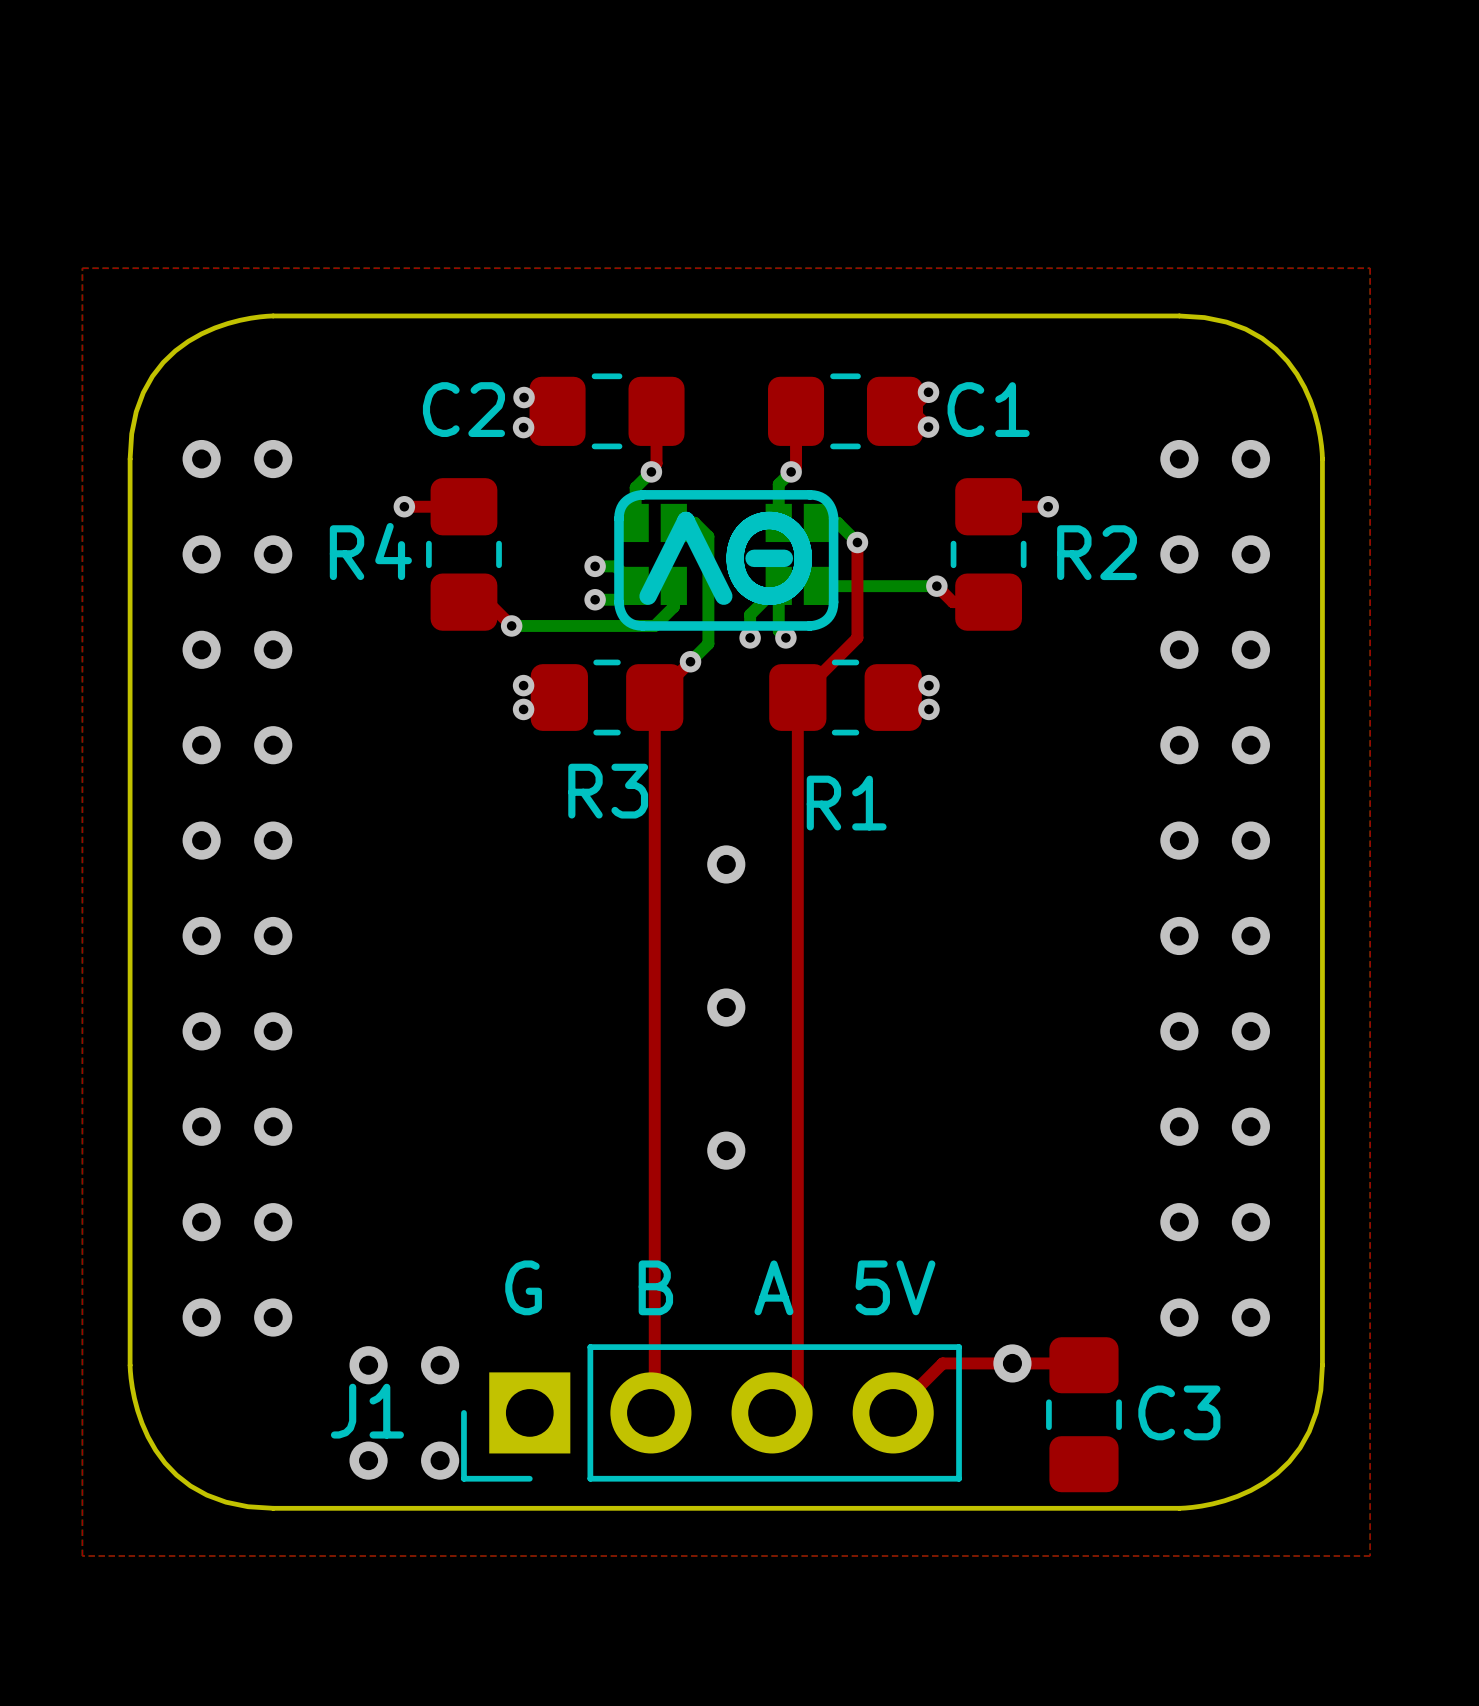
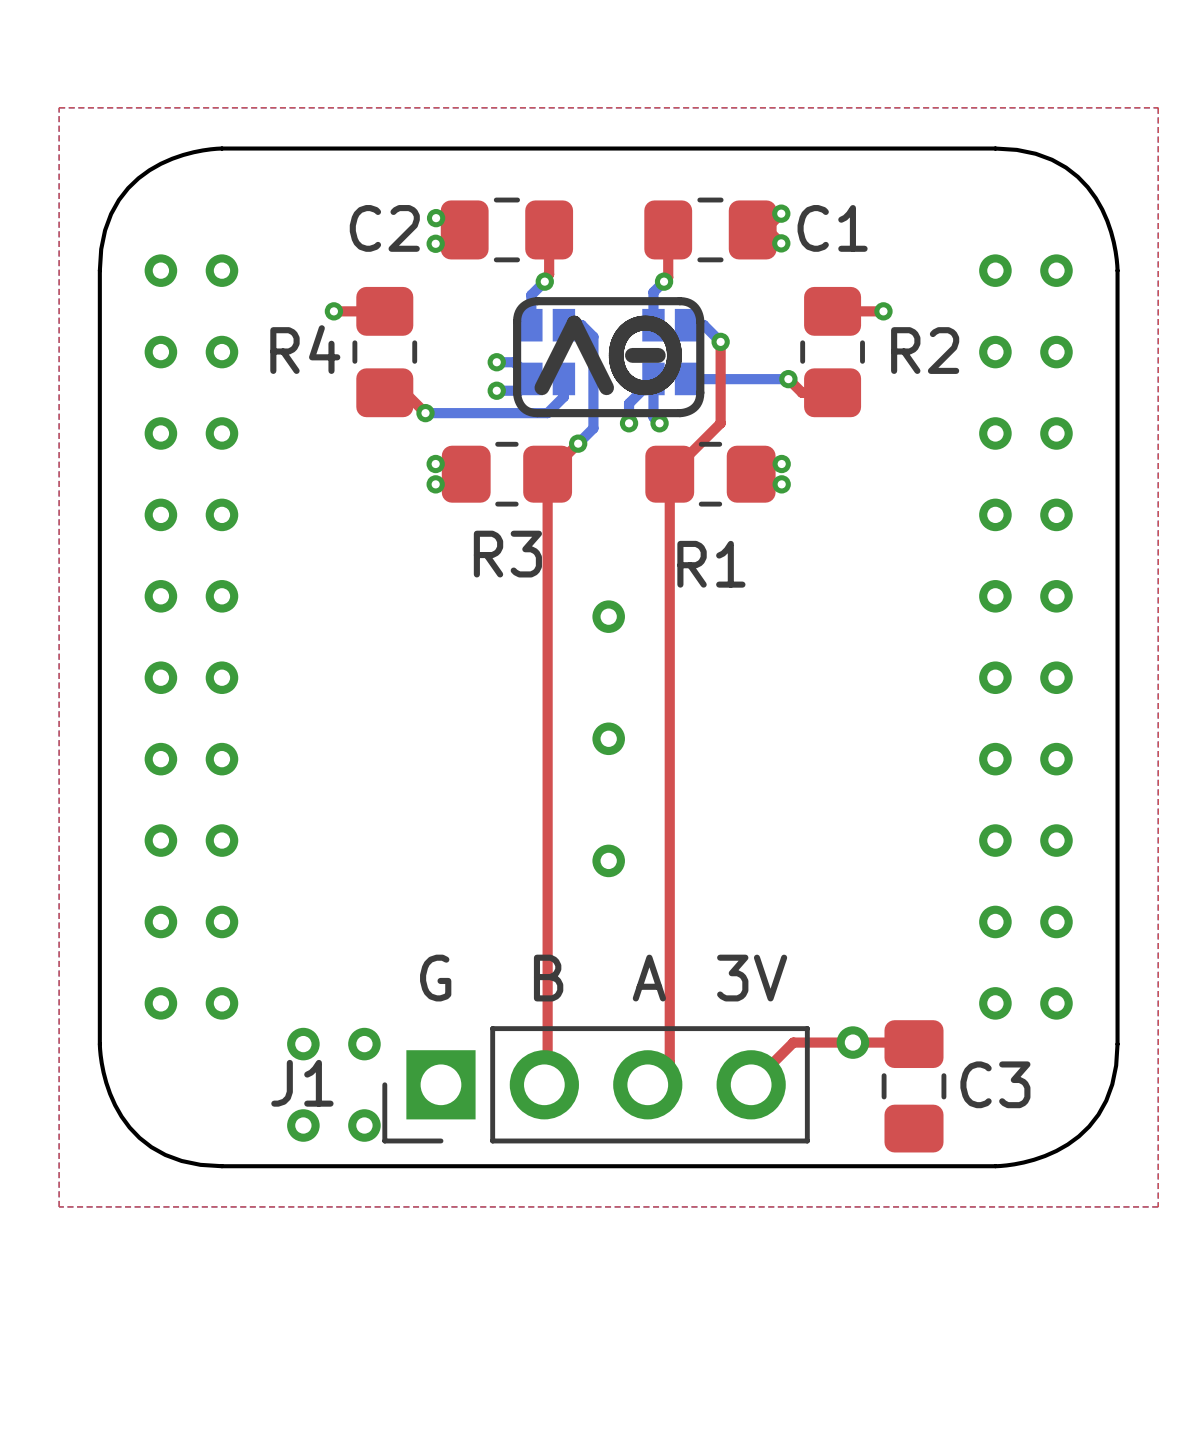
text: 5V (895, 1287) -> 3V (752, 978)

